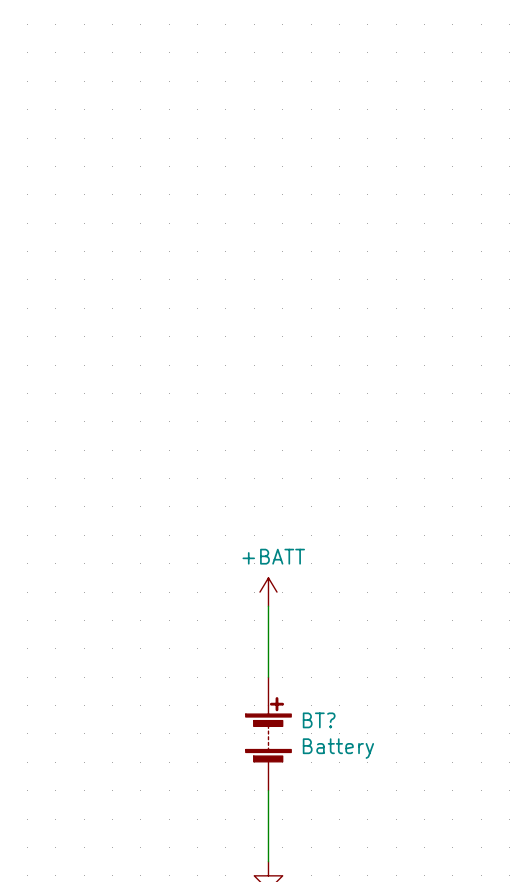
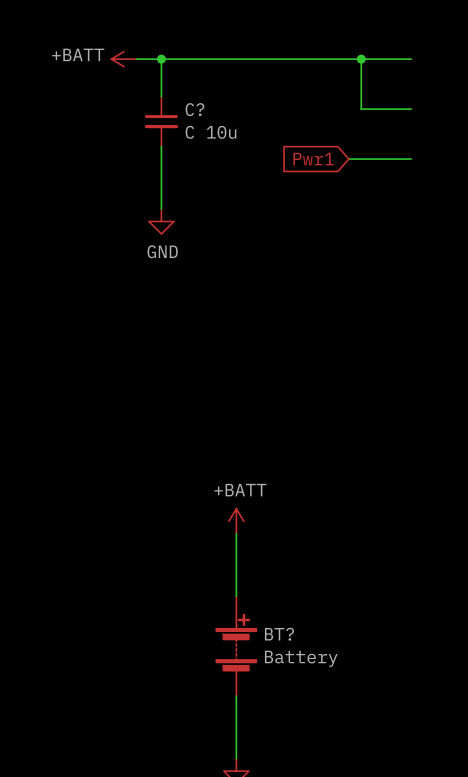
power symbol: none -> +BATT (123, 59)
wire: none -> (136, 59) (411, 59)
wire: none -> (161, 59) (161, 96)
junction: none -> (161, 59)
wire: none -> (361, 59) (361, 109) (411, 109)
junction: none -> (361, 59)
C?: none -> C 10u (161, 121)
wire: none -> (161, 146) (161, 209)
global label: none -> Pwr1 (313, 159)
wire: none -> (348, 159) (411, 159)
power symbol: none -> GND (161, 221)

